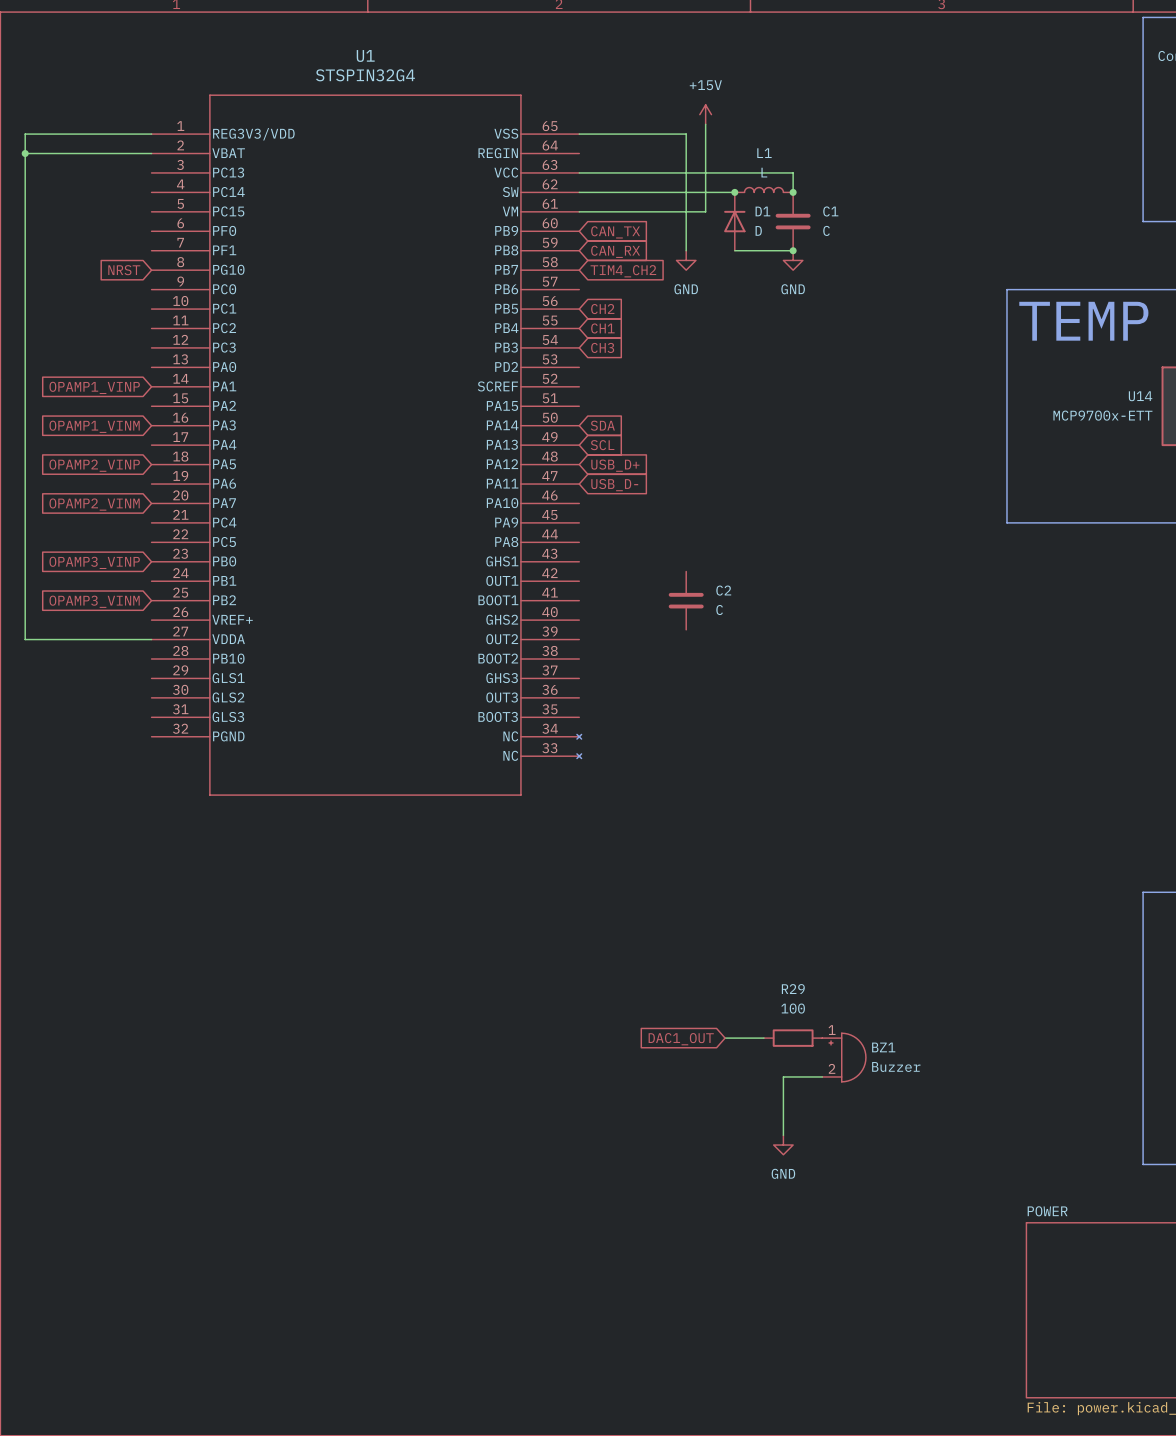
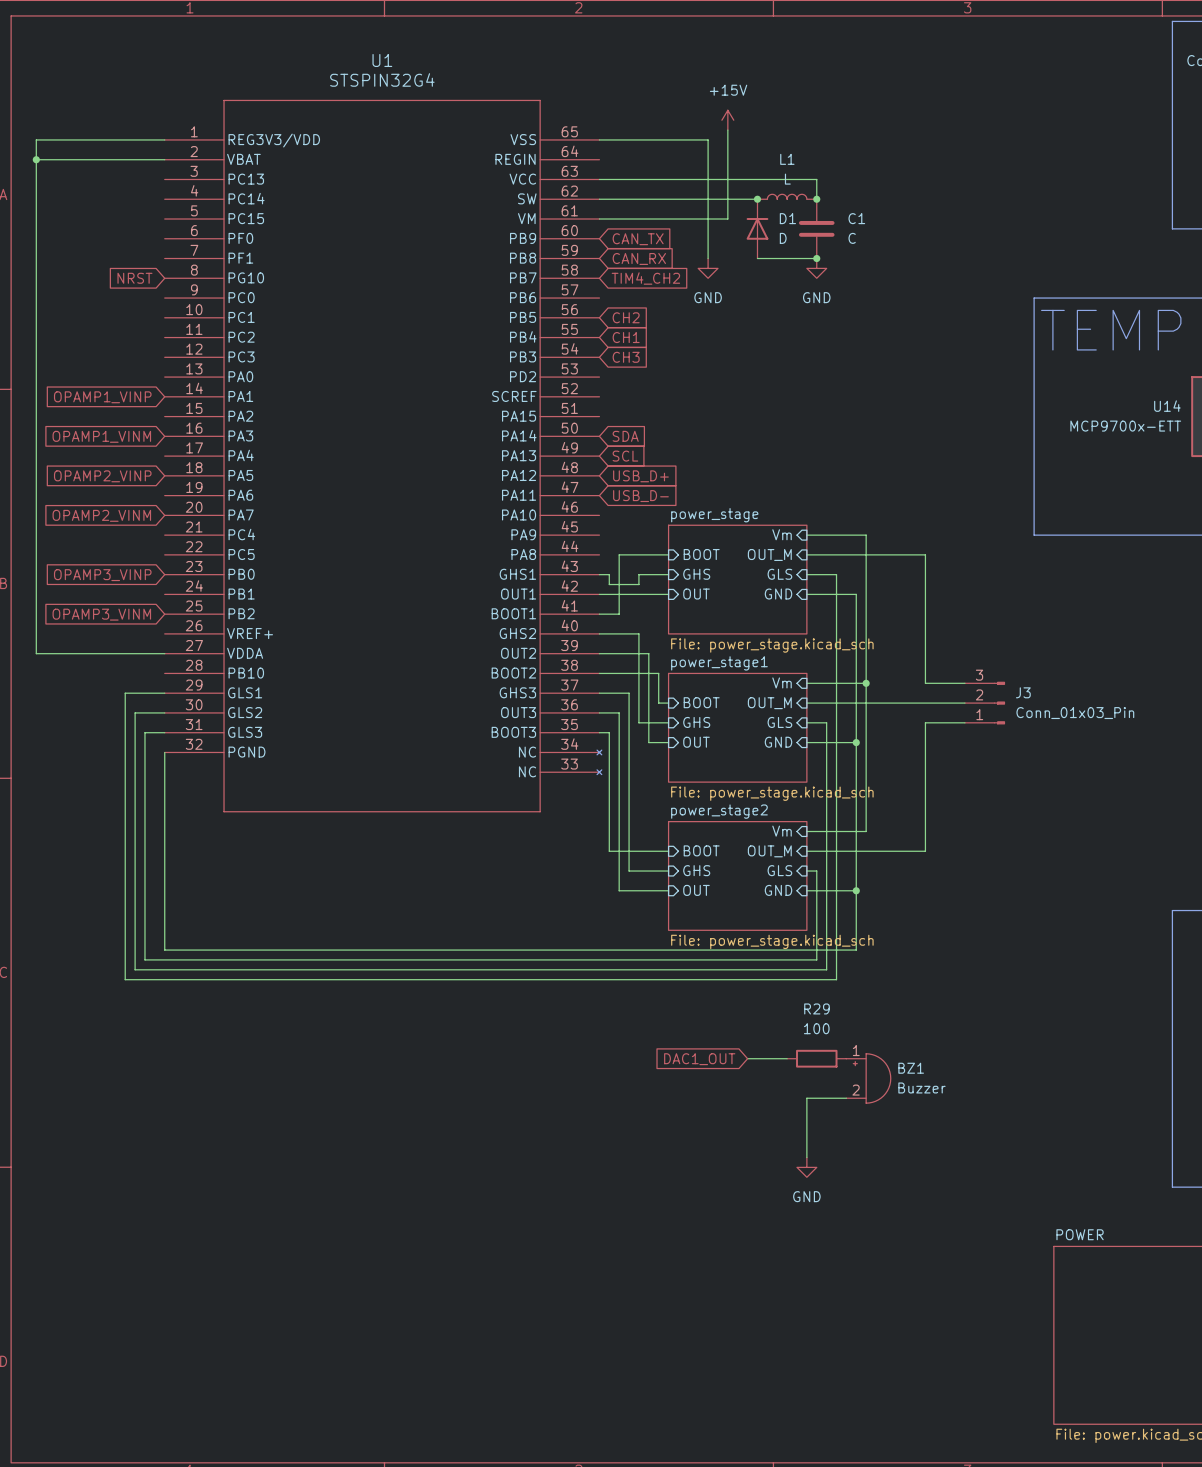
sheet pin: none -> Vm (782, 534)
wire: none -> (806, 535) (866, 535) (866, 831) (806, 831)
sheet pin: none -> BOOT (701, 554)
wire: none -> (668, 554) (619, 554) (619, 614) (599, 614)
wire: none -> (806, 554) (925, 554) (925, 683) (964, 683)
sheet pin: none -> OUT_M (769, 554)
wire: none -> (599, 574) (609, 574) (609, 584) (638, 584) (638, 574) (668, 574)
sheet pin: none -> GHS (696, 574)
sheet pin: none -> GLS (779, 574)
wire: none -> (806, 574) (836, 574) (836, 979) (125, 979) (125, 693) (164, 693)
sheet power_stage: none -> File: power_stage.kicad_sch (737, 579)
sheet pin: none -> OUT (696, 594)
sheet pin: none -> GND (778, 594)
wire: none -> (599, 594) (668, 594)
wire: none -> (806, 594) (856, 594) (856, 950) (164, 950) (164, 752)
C2: C (686, 600) -> none
wire: none -> (599, 633) (638, 633) (638, 722) (668, 722)
wire: none -> (599, 653) (648, 653) (648, 742) (668, 742)
wire: none -> (599, 673) (658, 673) (658, 703) (668, 703)
sheet pin: none -> Vm (782, 682)
wire: none -> (806, 683) (866, 683)
junction: none -> (866, 683)
wire: none -> (599, 693) (629, 693) (629, 871) (668, 871)
sheet pin: none -> BOOT (701, 702)
sheet pin: none -> OUT_M (769, 703)
wire: none -> (806, 703) (964, 703)
J3: none -> Conn_01x03_Pin (985, 703)
wire: none -> (164, 712) (135, 712) (135, 969) (826, 969) (826, 722) (806, 722)
wire: none -> (599, 712) (619, 712) (619, 890) (668, 890)
sheet pin: none -> GHS (696, 722)
sheet pin: none -> GLS (779, 722)
wire: none -> (964, 722) (925, 722) (925, 851) (806, 851)
sheet power_stage1: none -> File: power_stage.kicad_sch (737, 727)
wire: none -> (164, 732) (144, 732) (144, 959) (816, 959) (816, 871) (806, 871)
wire: none -> (599, 732) (609, 732) (609, 851) (668, 851)
sheet pin: none -> OUT (696, 742)
sheet pin: none -> GND (778, 742)
wire: none -> (806, 742) (856, 742)
junction: none -> (856, 742)
sheet pin: none -> Vm (782, 831)
sheet pin: none -> BOOT (701, 850)
sheet pin: none -> OUT_M (769, 851)
sheet pin: none -> GHS (696, 870)
sheet pin: none -> GLS (779, 870)
sheet power_stage2: none -> File: power_stage.kicad_sch (737, 875)
sheet pin: none -> OUT (696, 890)
sheet pin: none -> GND (778, 890)
wire: none -> (806, 890) (856, 890)
junction: none -> (856, 890)

